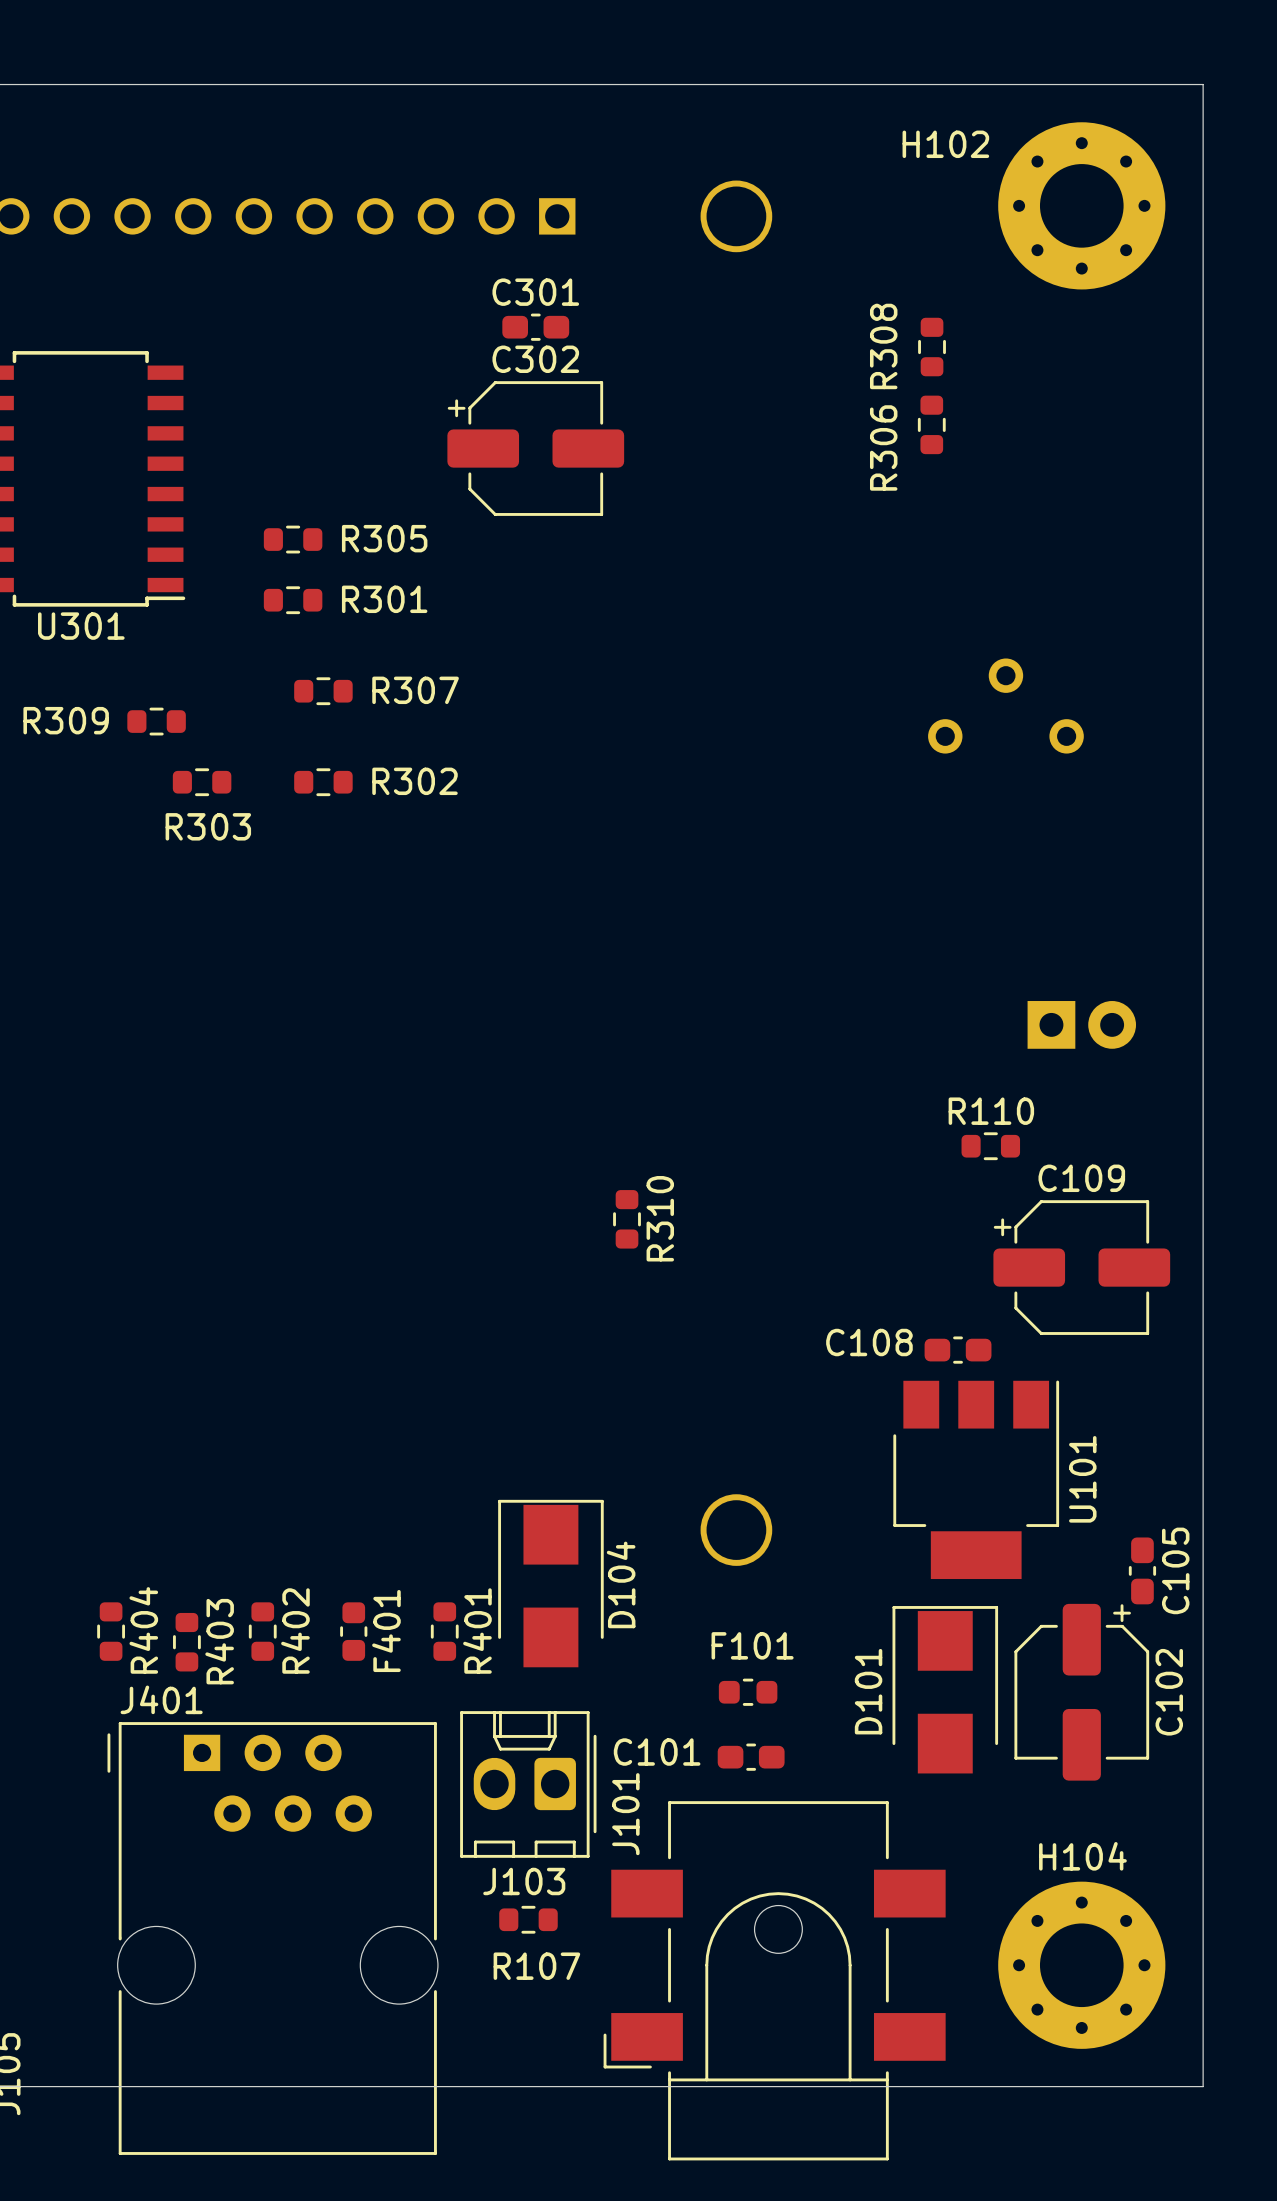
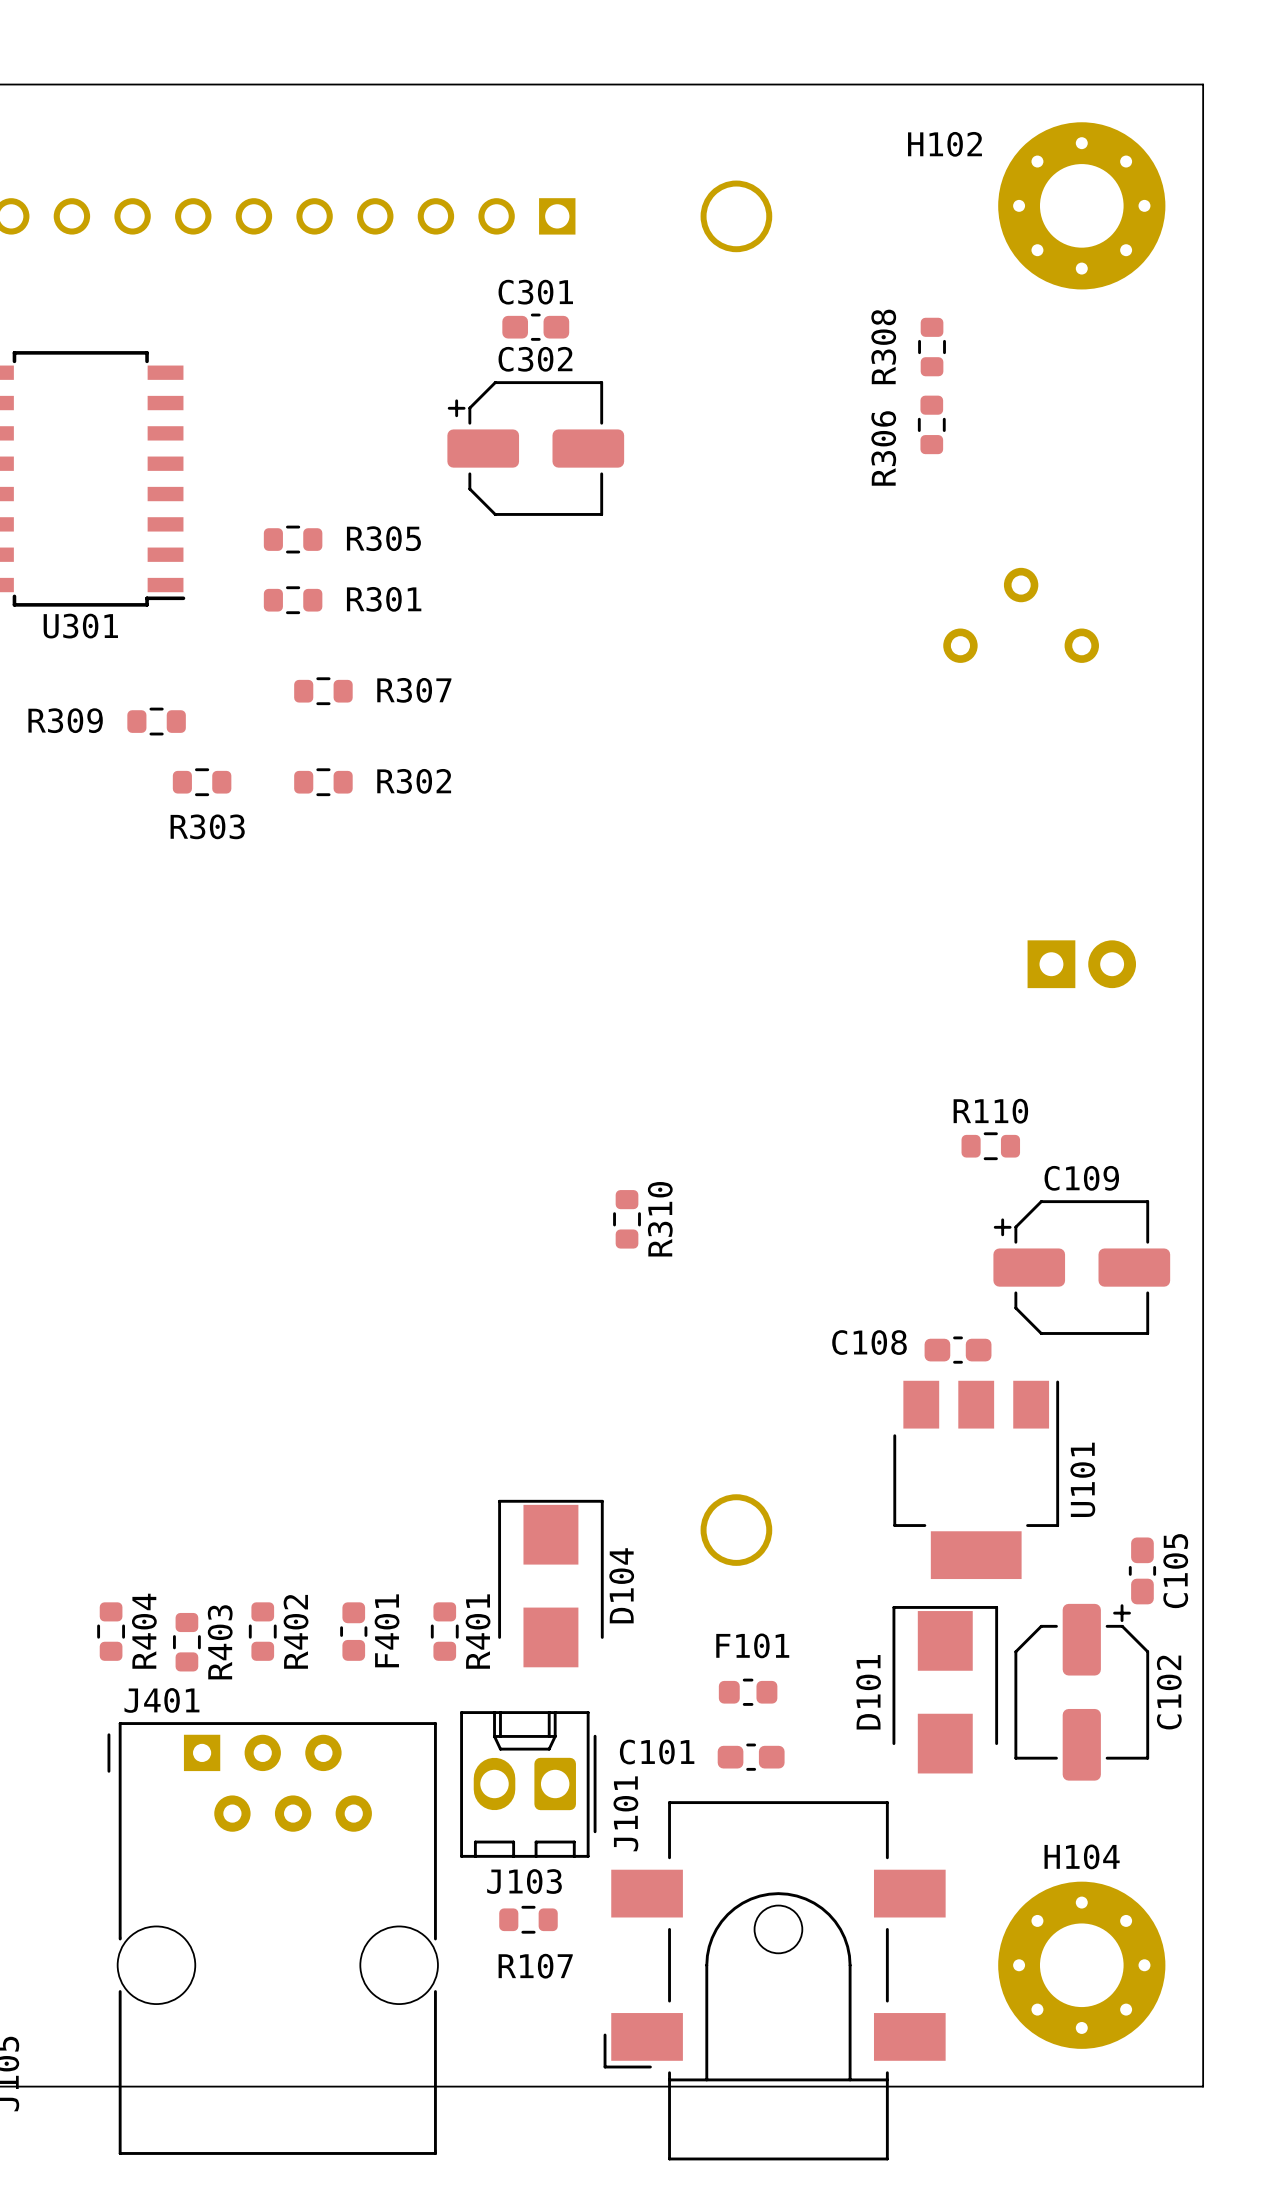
part position: (1005, 706) -> (1021, 615)
part position: (1081, 1024) -> (1081, 964)

